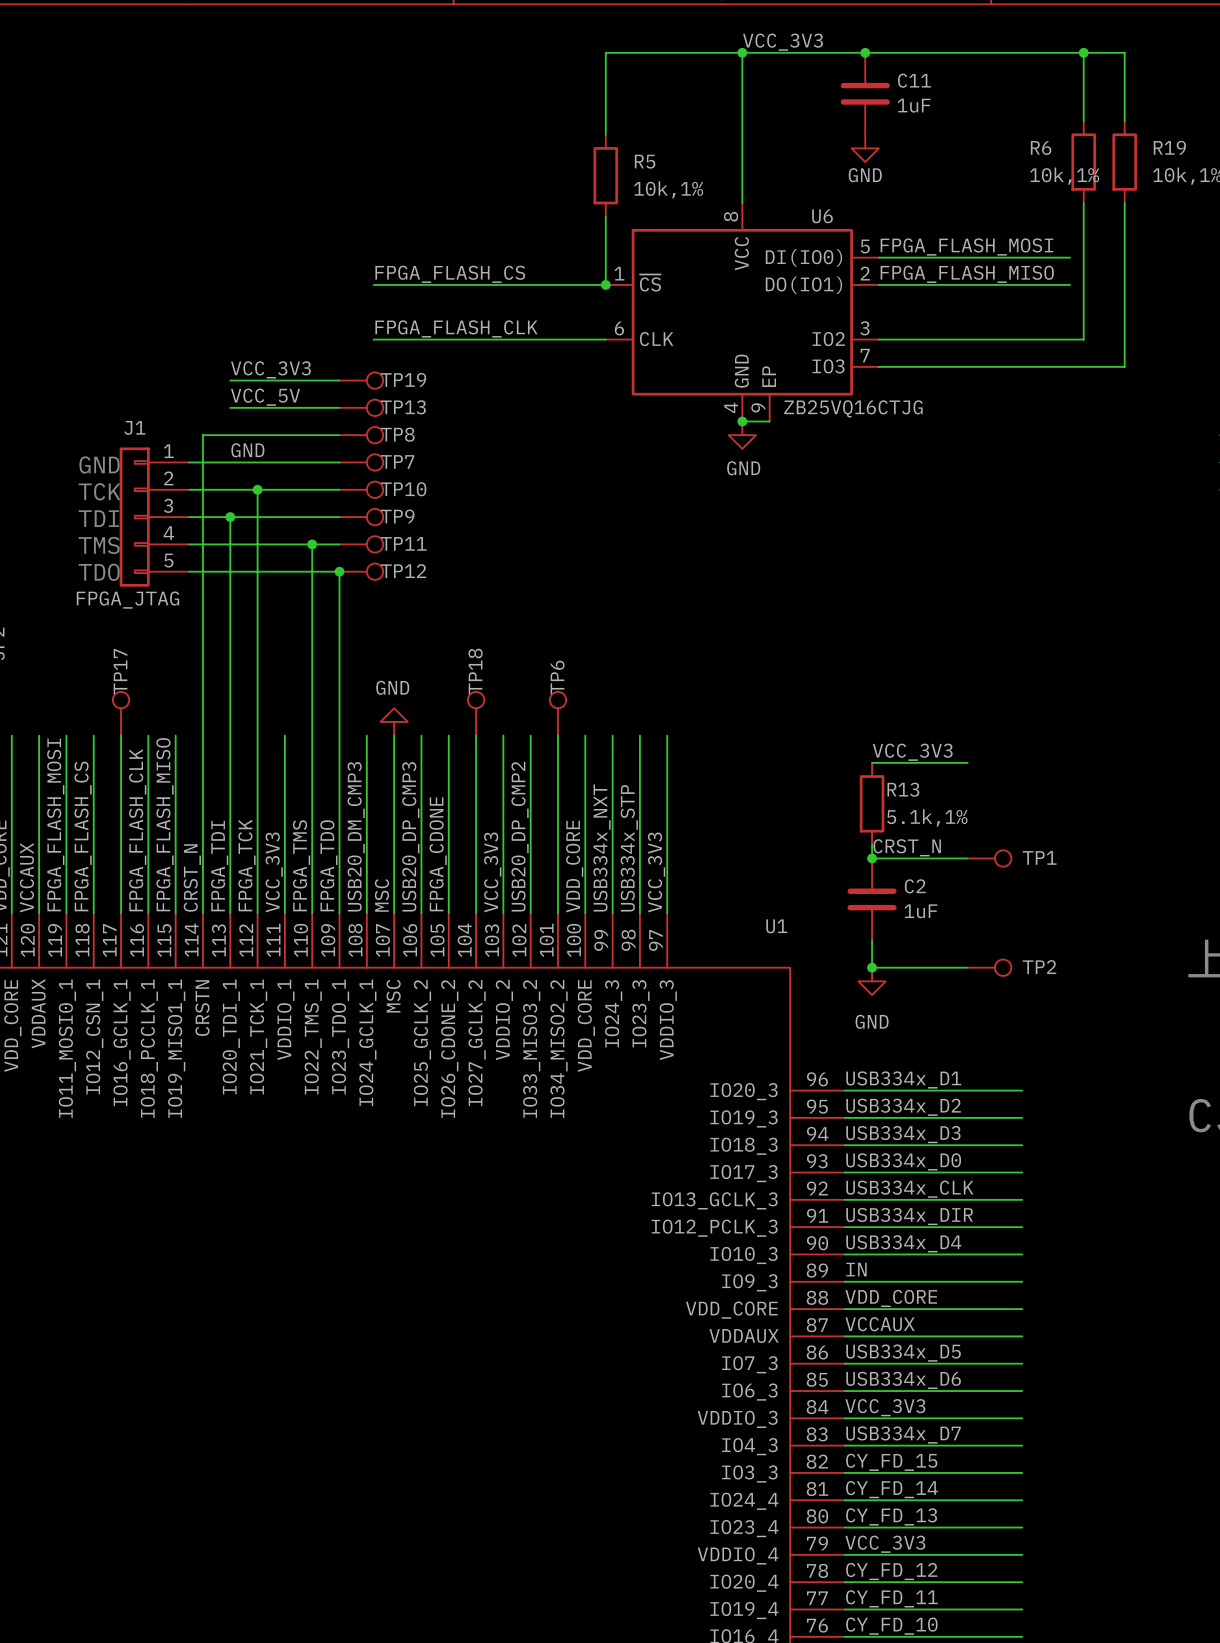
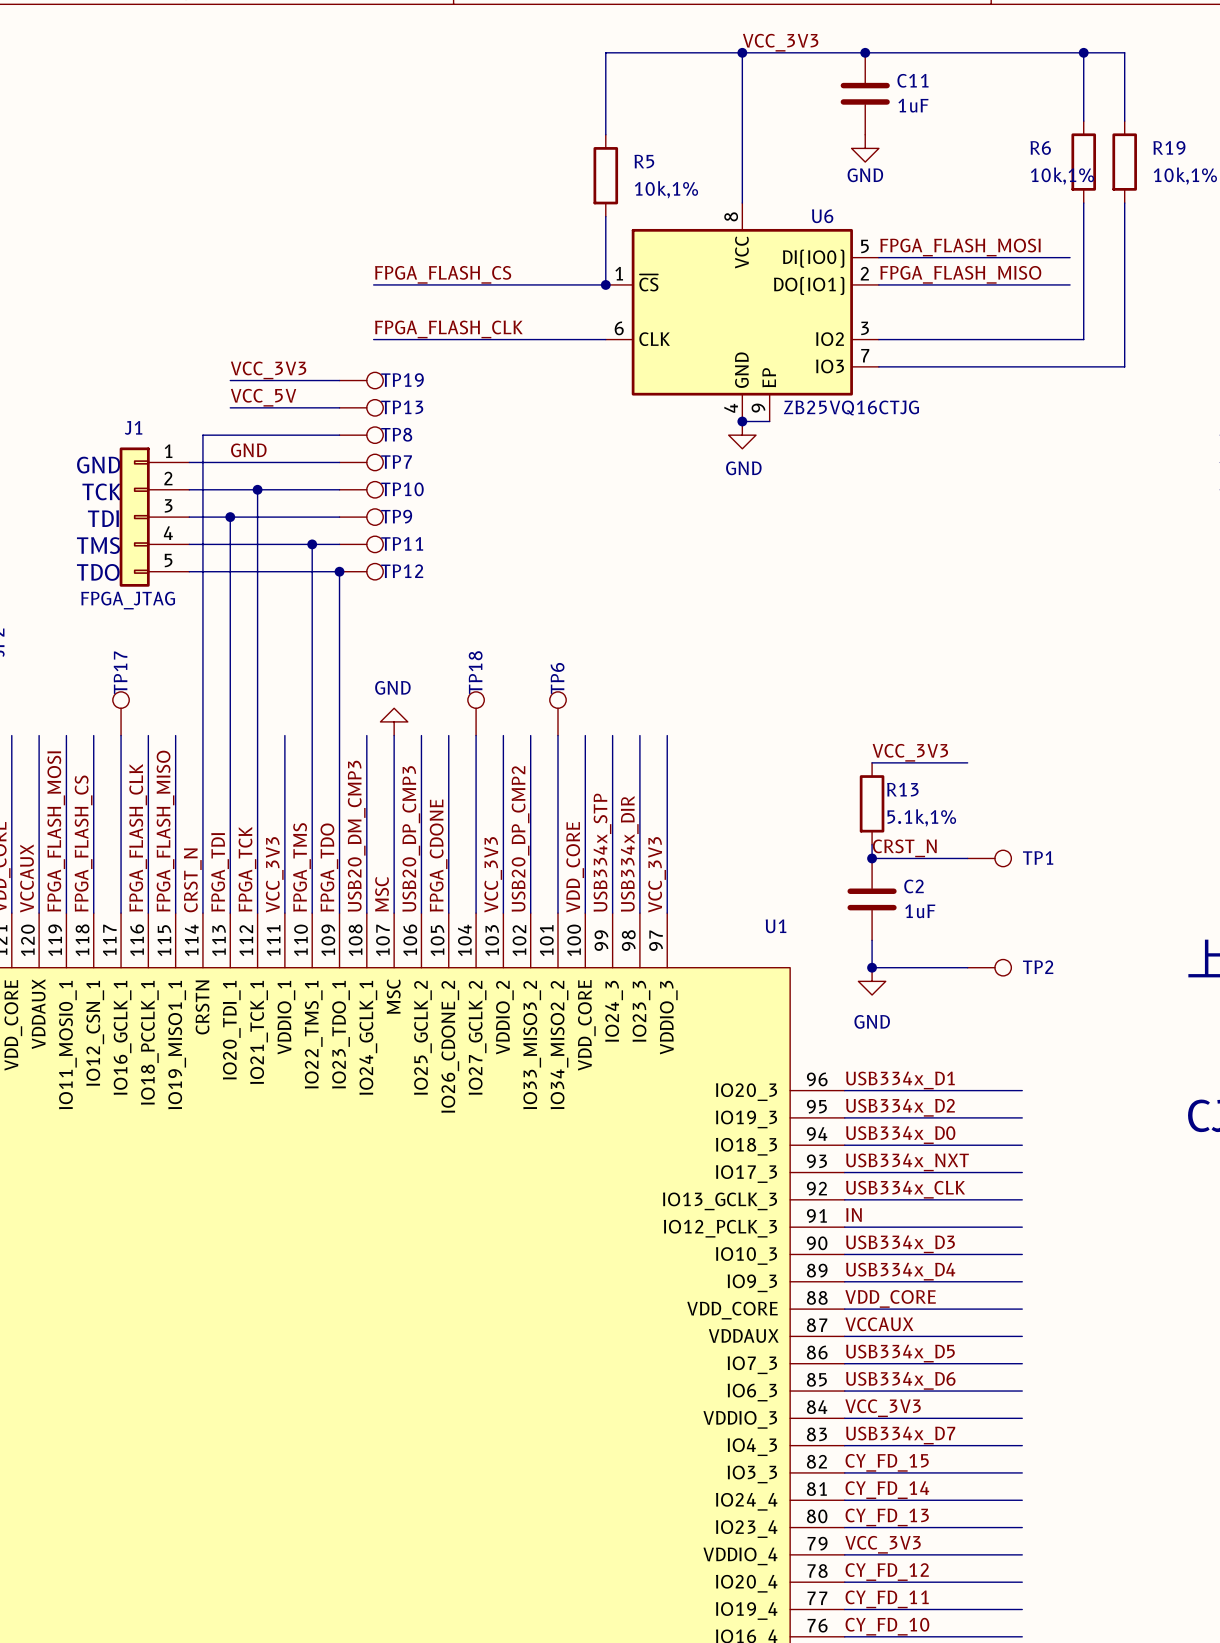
label: USB334x_NXT (601, 847) -> USB334x_STP (602, 852)
label: USB334x_STP (629, 848) -> USB334x_DIR (629, 853)
label: USB334x_D3 (903, 1134) -> USB334x_D0 (900, 1135)
label: USB334x_D0 (903, 1161) -> USB334x_NXT (907, 1162)
label: USB334x_DIR (909, 1216) -> IN (853, 1214)
label: USB334x_D4 (903, 1243) -> USB334x_D3 (900, 1244)
label: IN (856, 1269) -> USB334x_D4 (900, 1271)

